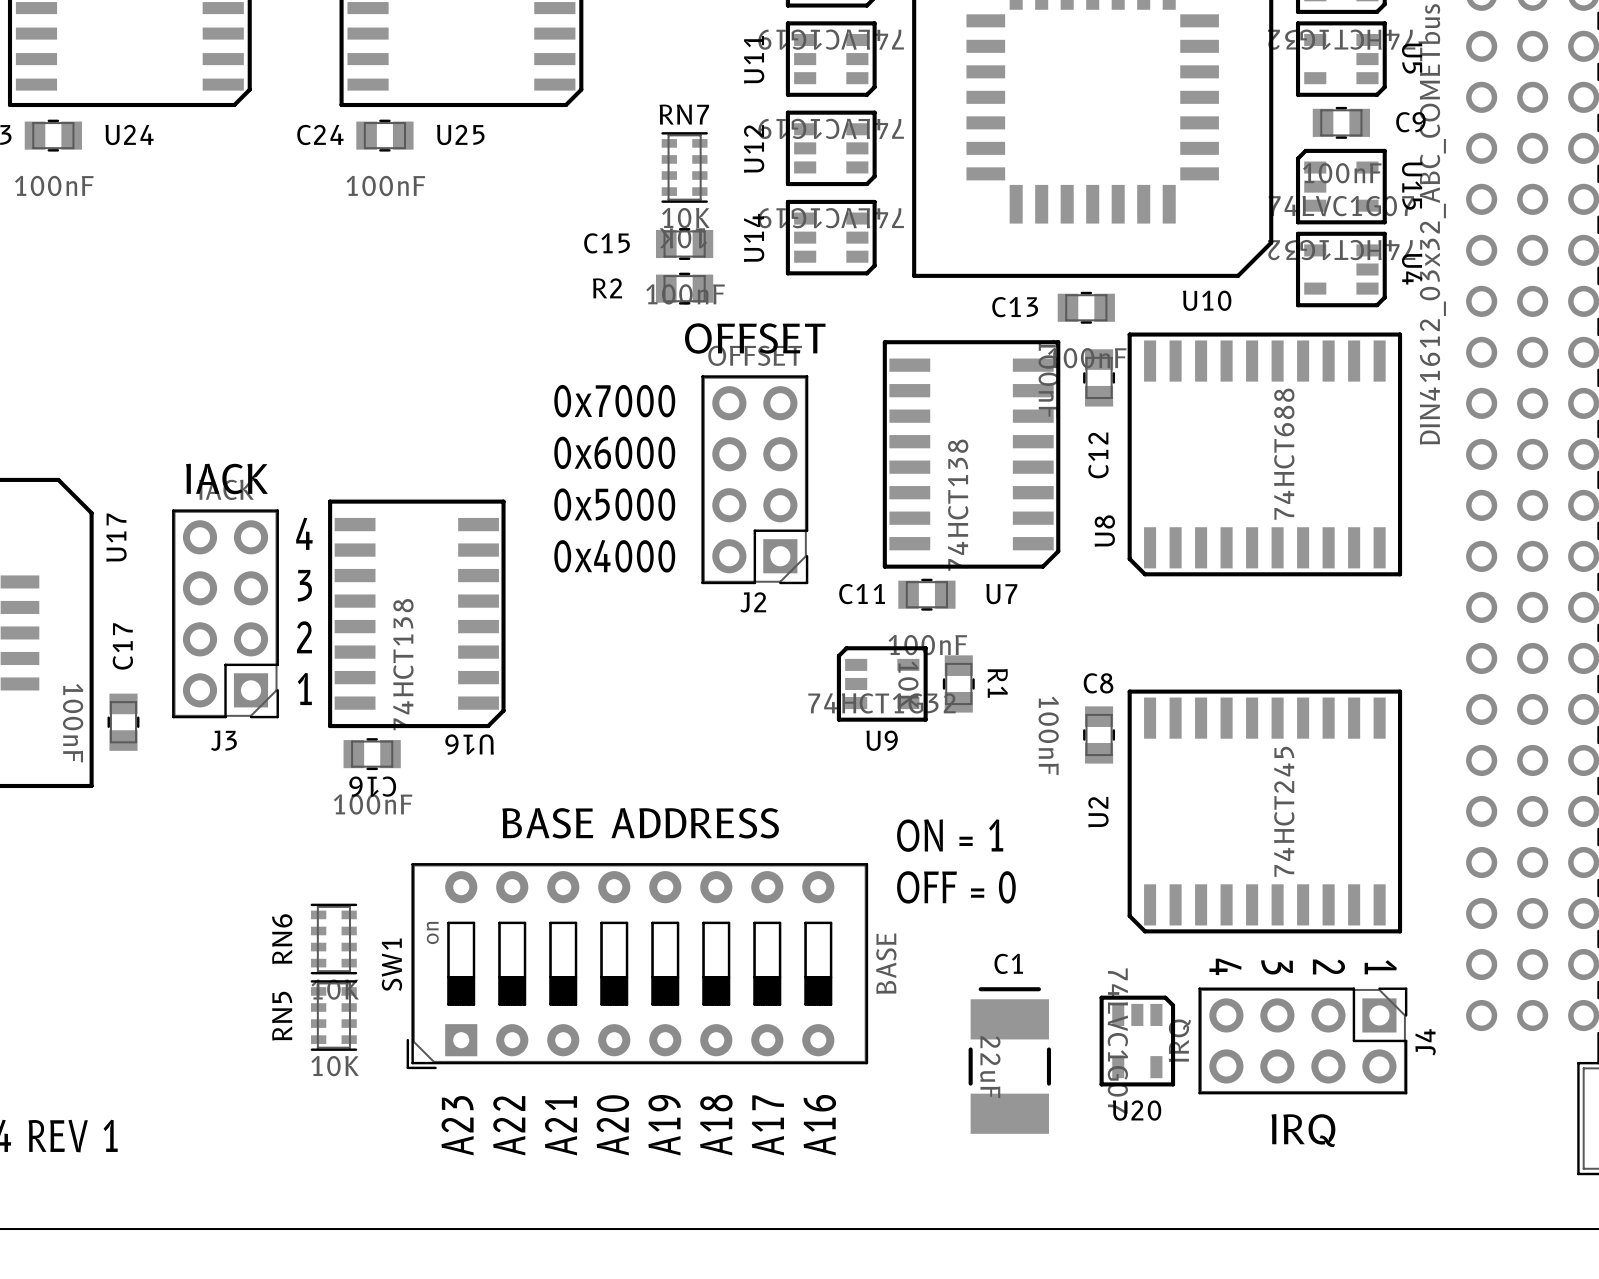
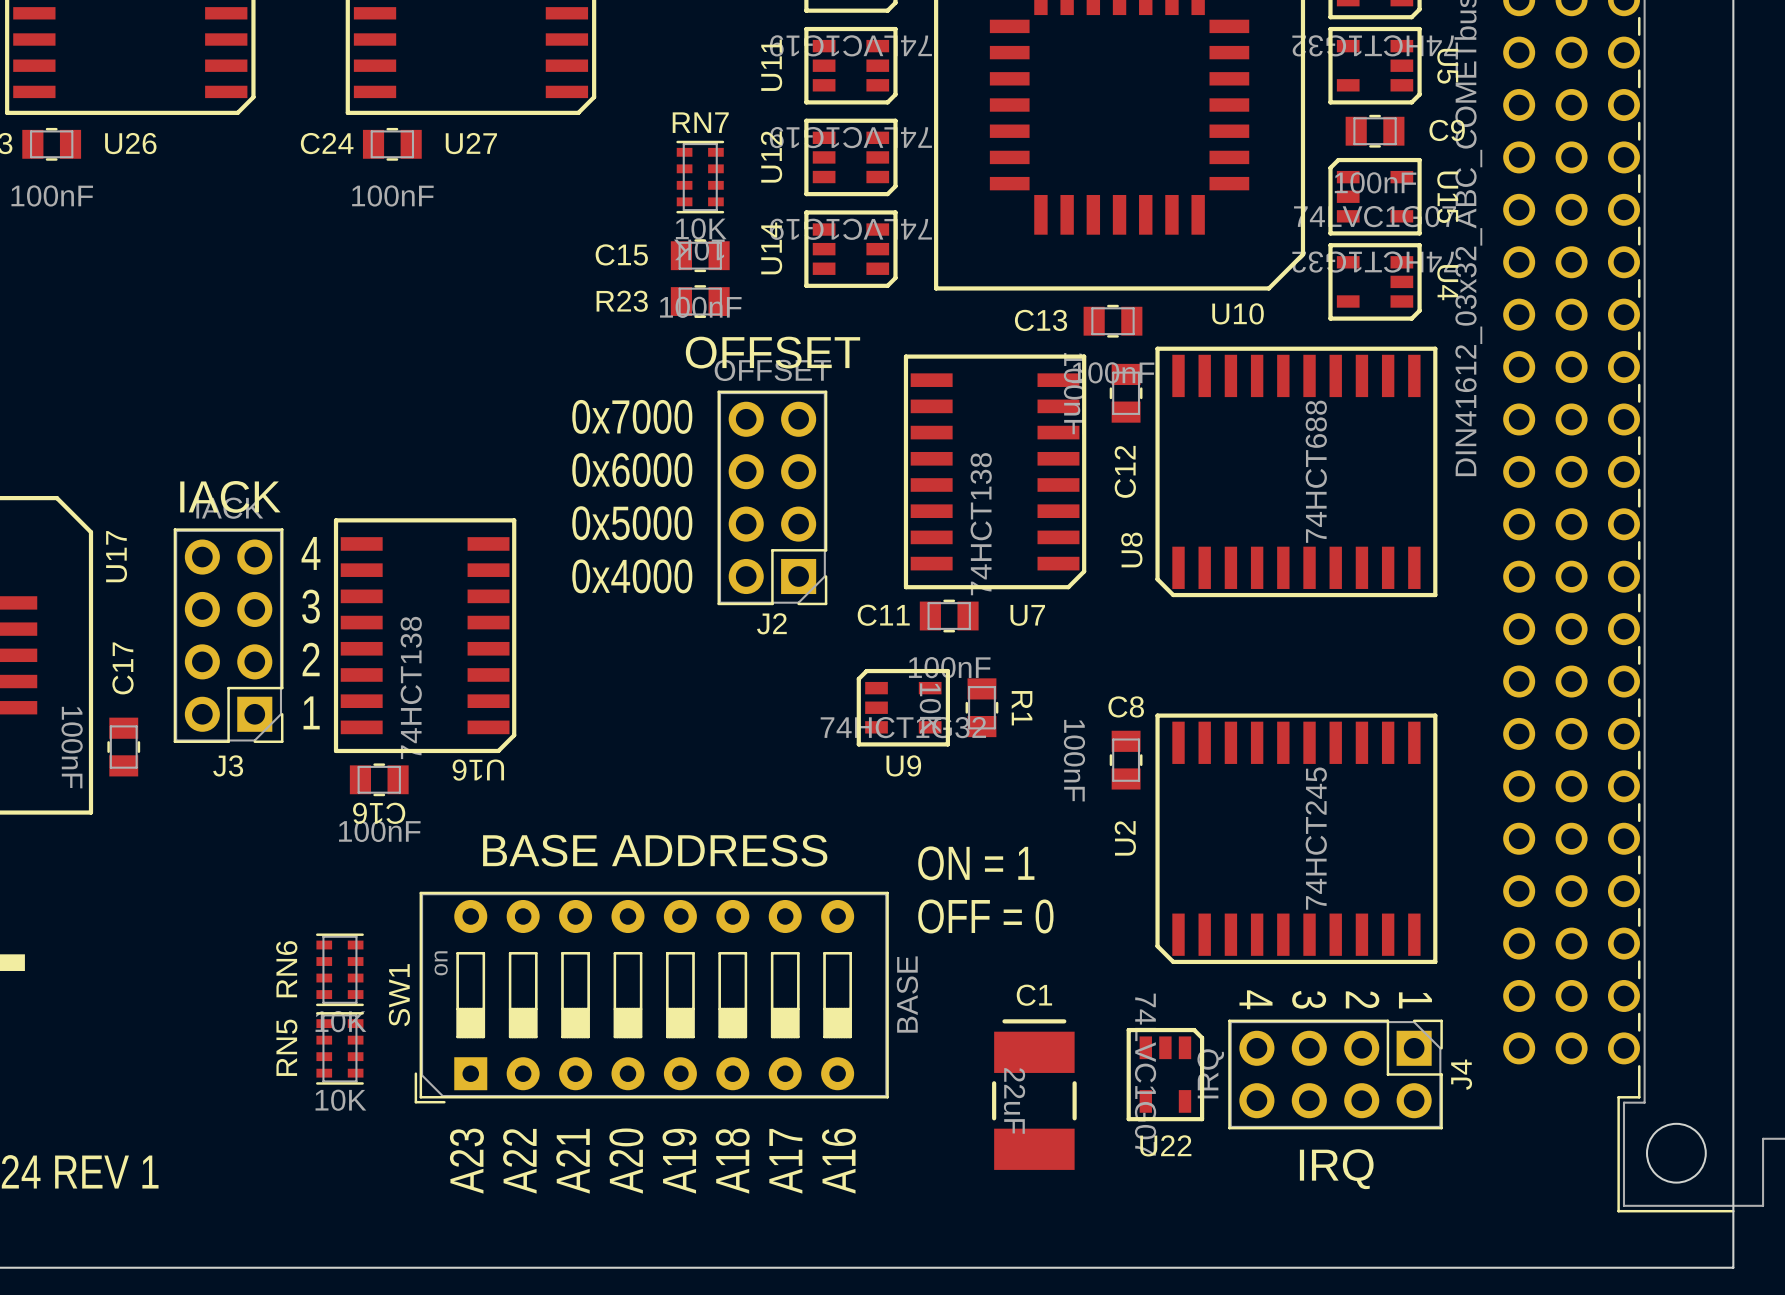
U24 name: U24 (129, 134) -> U26 (130, 143)
U25 name: U25 (460, 134) -> U27 (471, 143)
R2 name: R2 (607, 288) -> R23 (622, 301)
U20 name: U20 (1137, 1110) -> U22 (1165, 1145)

